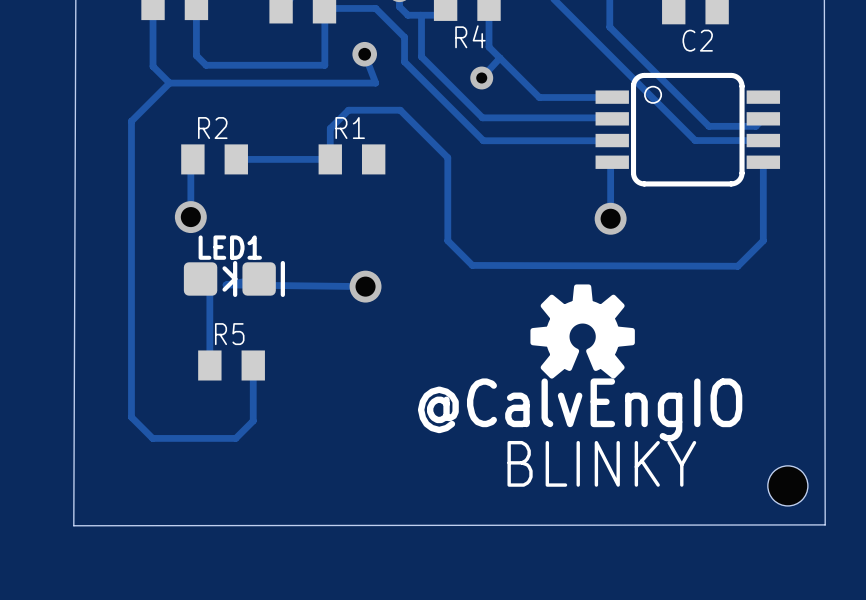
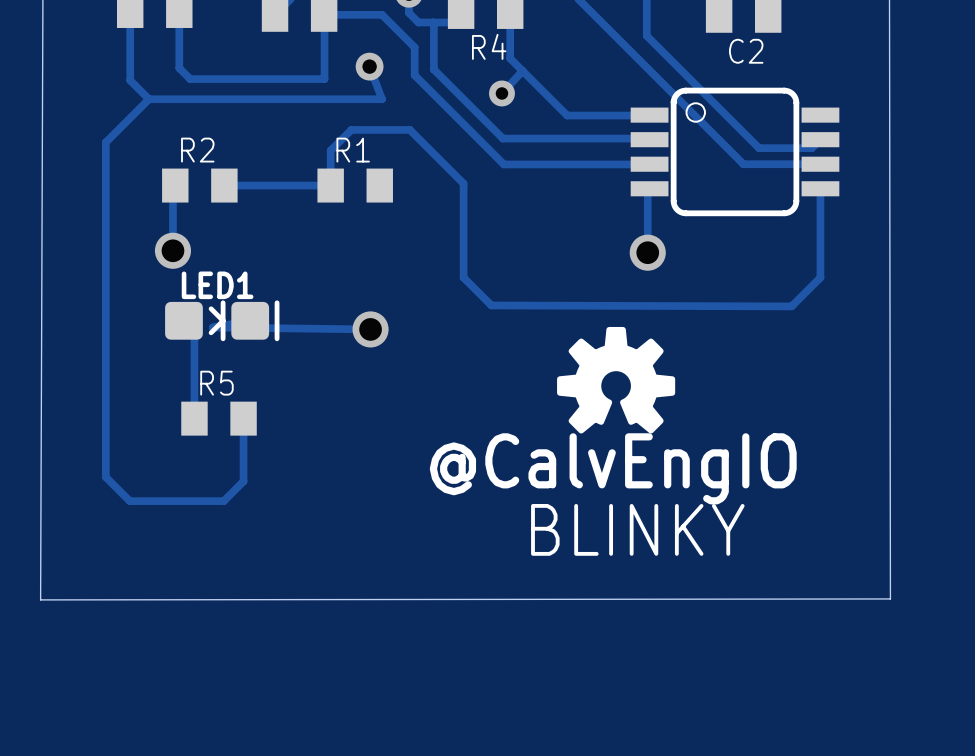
hole: (787, 485) -> none

